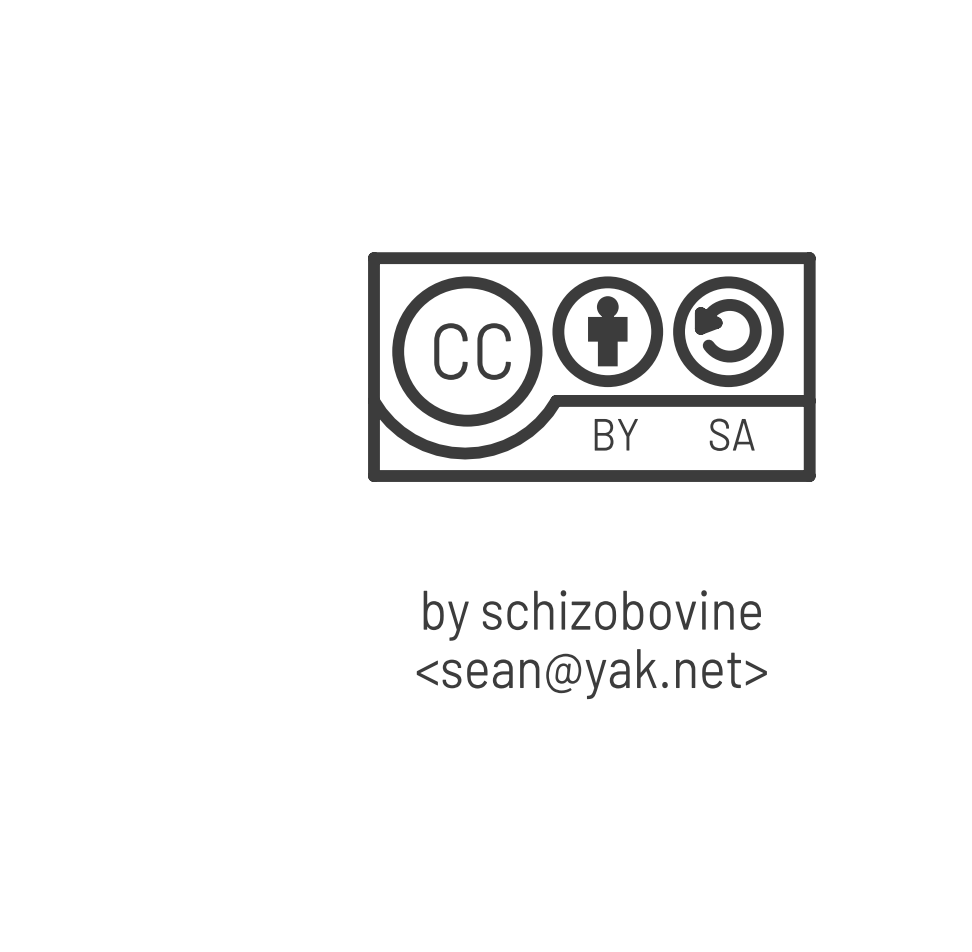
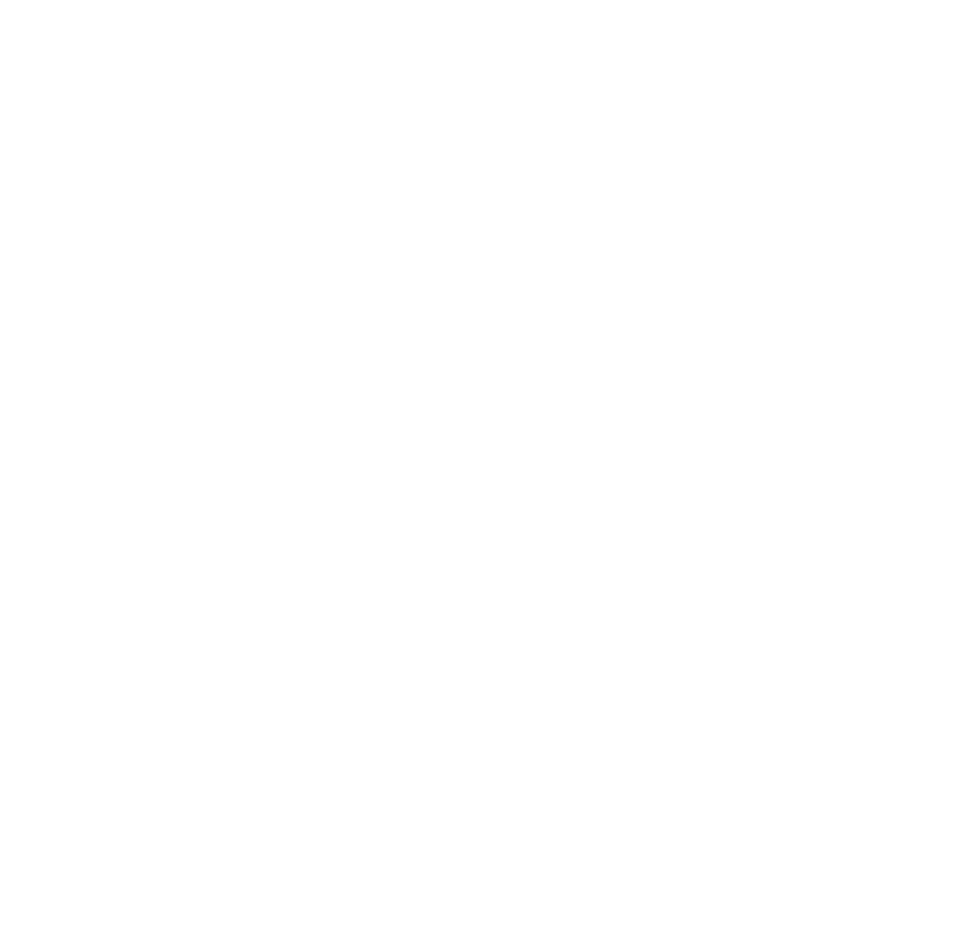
drawing: [368, 252, 816, 482] -> none
text: by schizobovine (592, 615) -> none
text: <sean@yak.net> (591, 674) -> none

